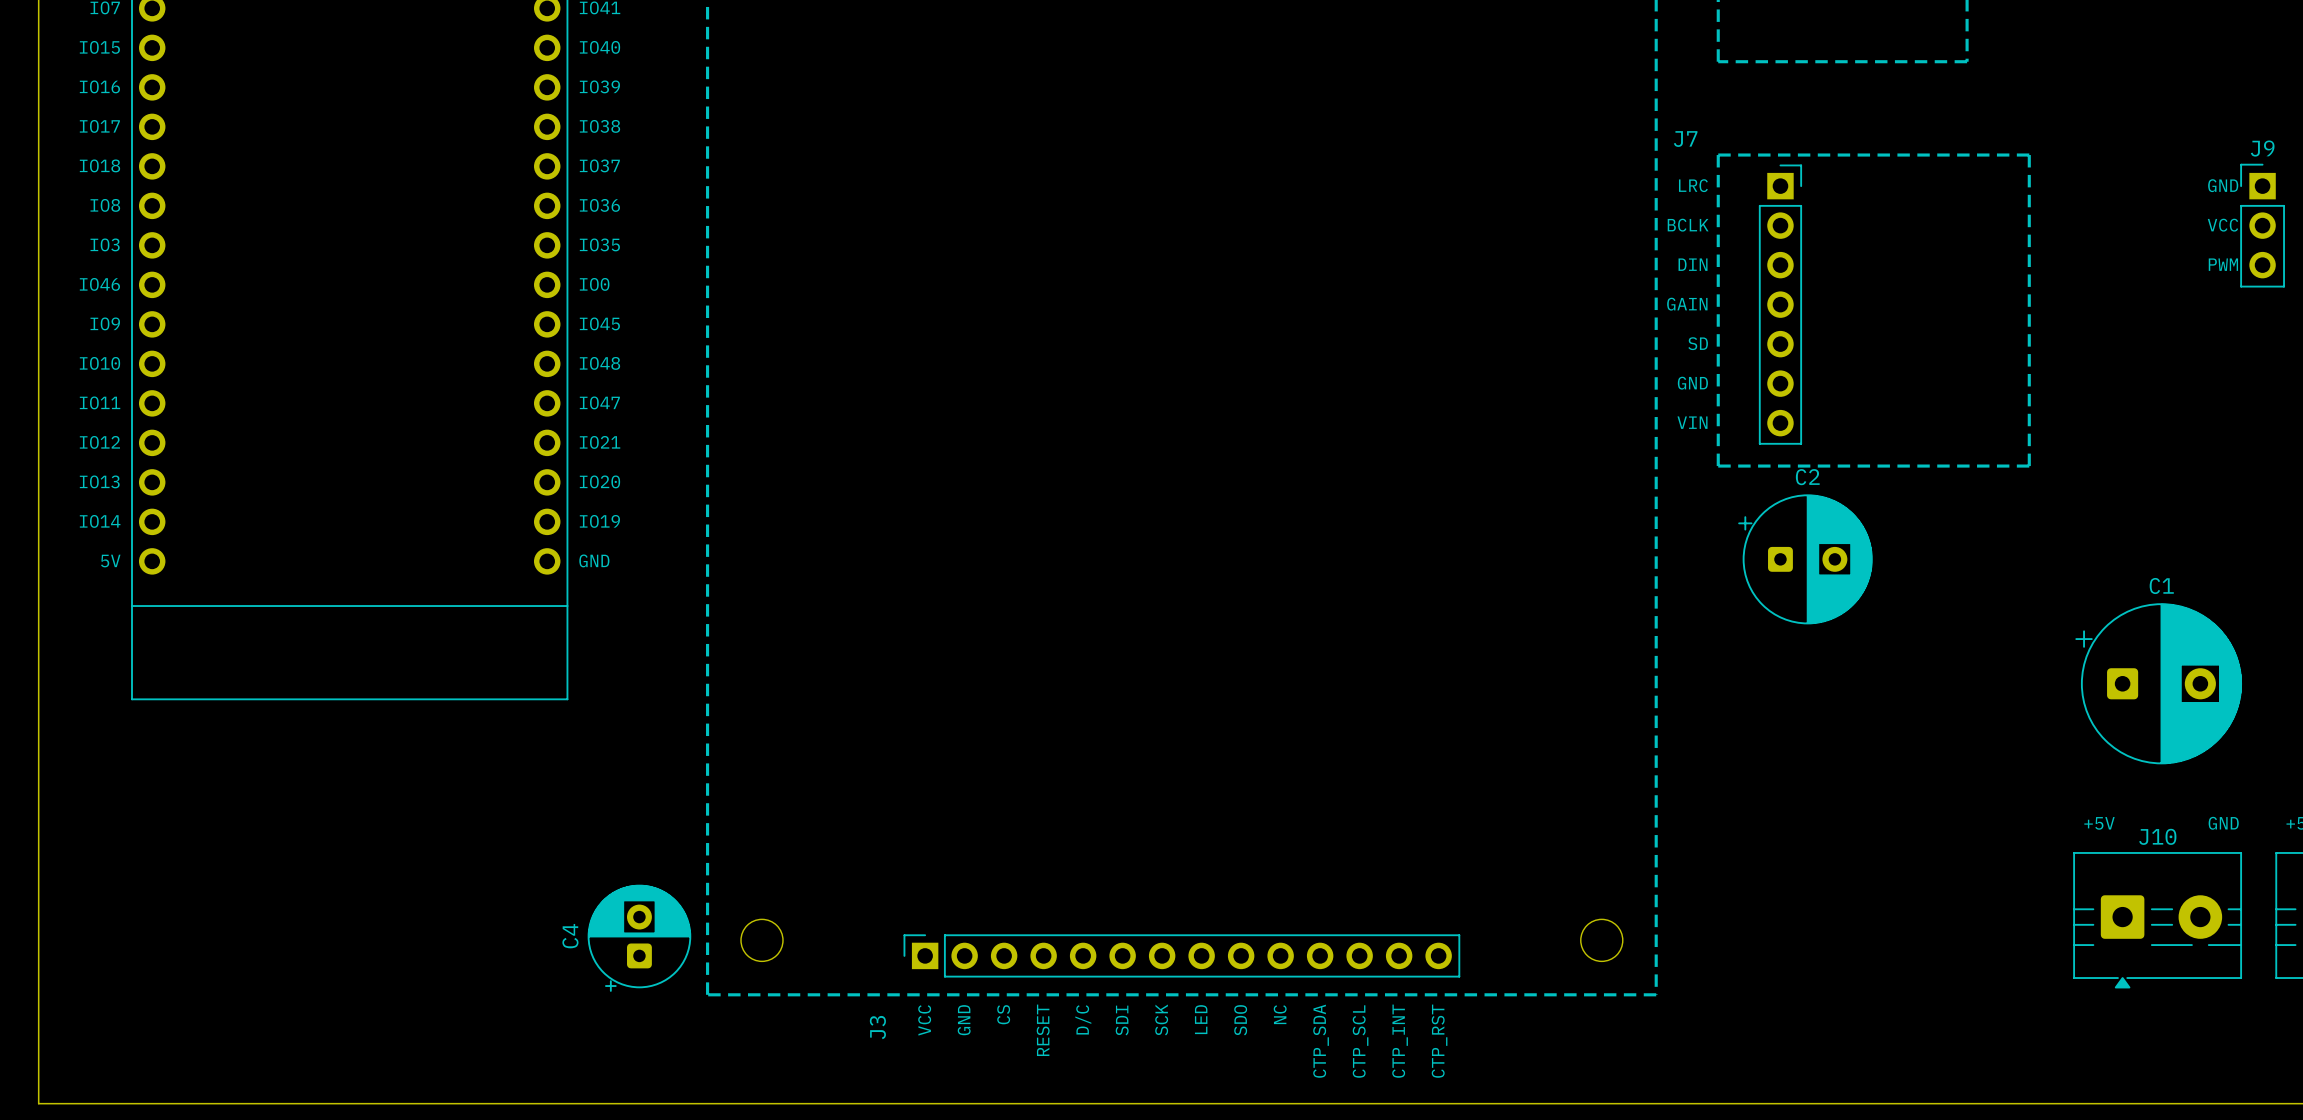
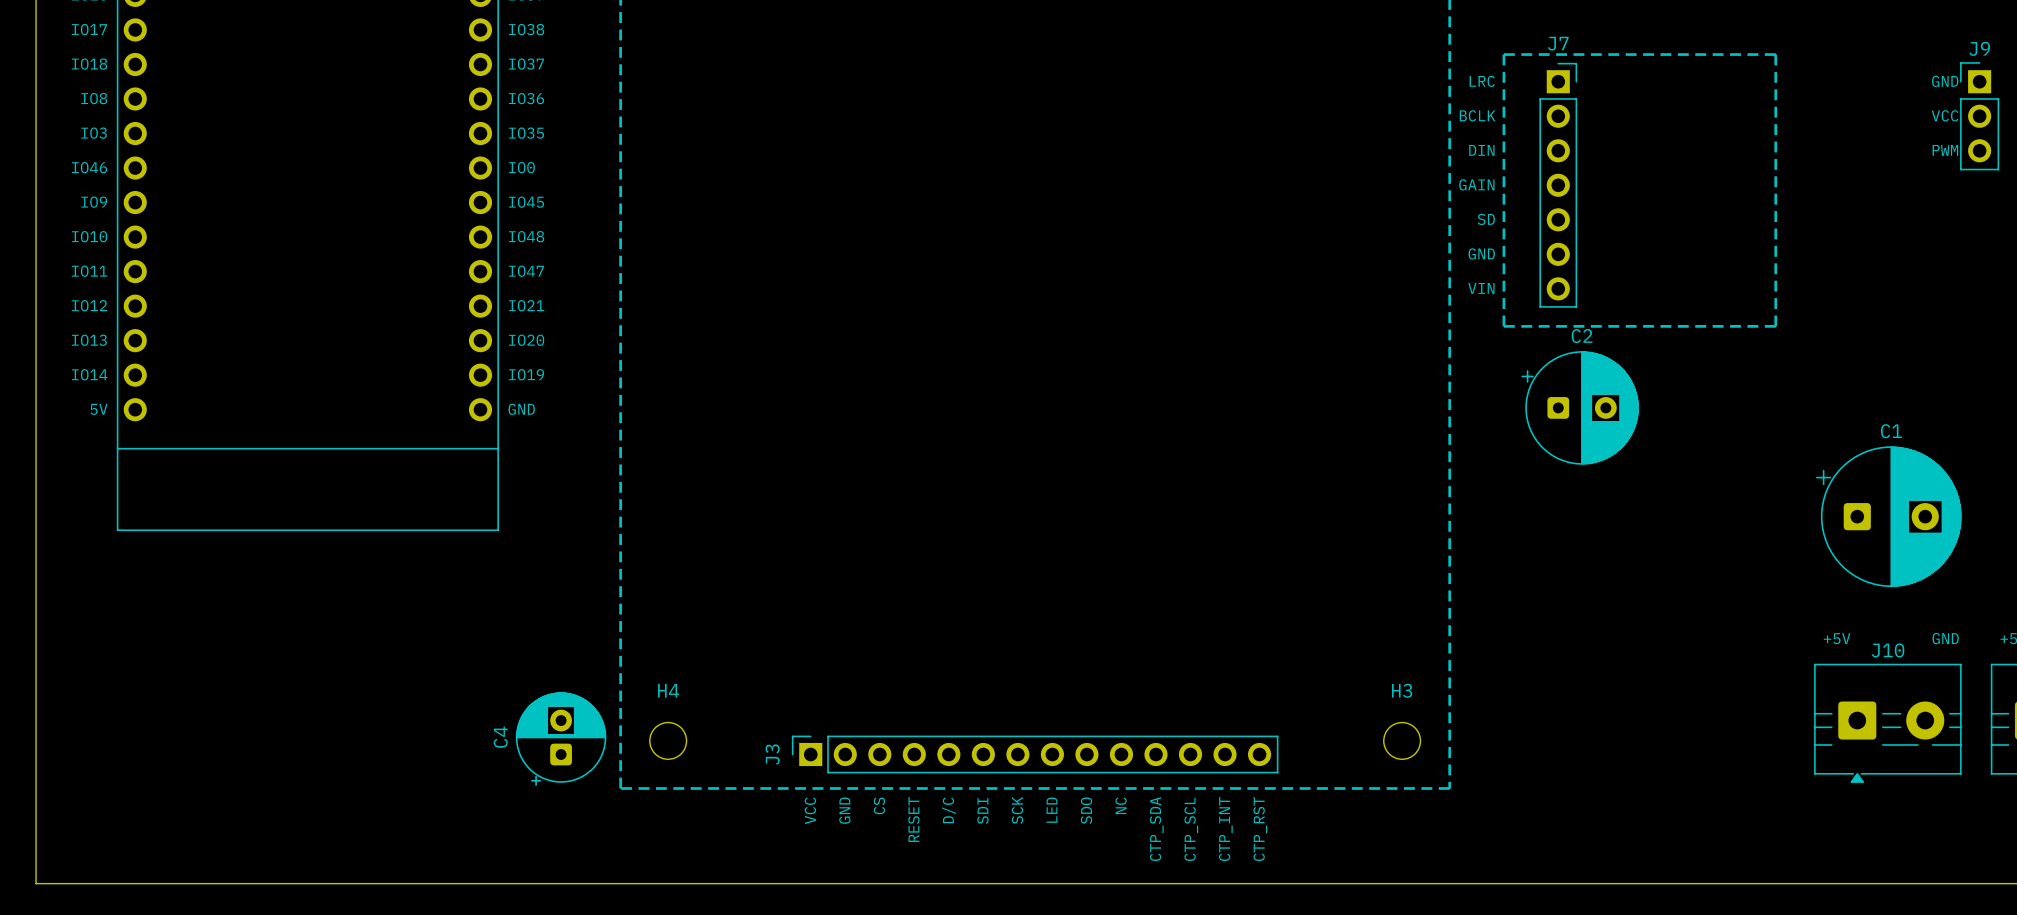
J7 name position: J7 (1685, 139) -> J7 (1558, 43)
H4 name: none -> H4 (668, 690)
H3 name: none -> H3 (1402, 690)
J3 name position: J3 (877, 1027) -> J3 (772, 754)

